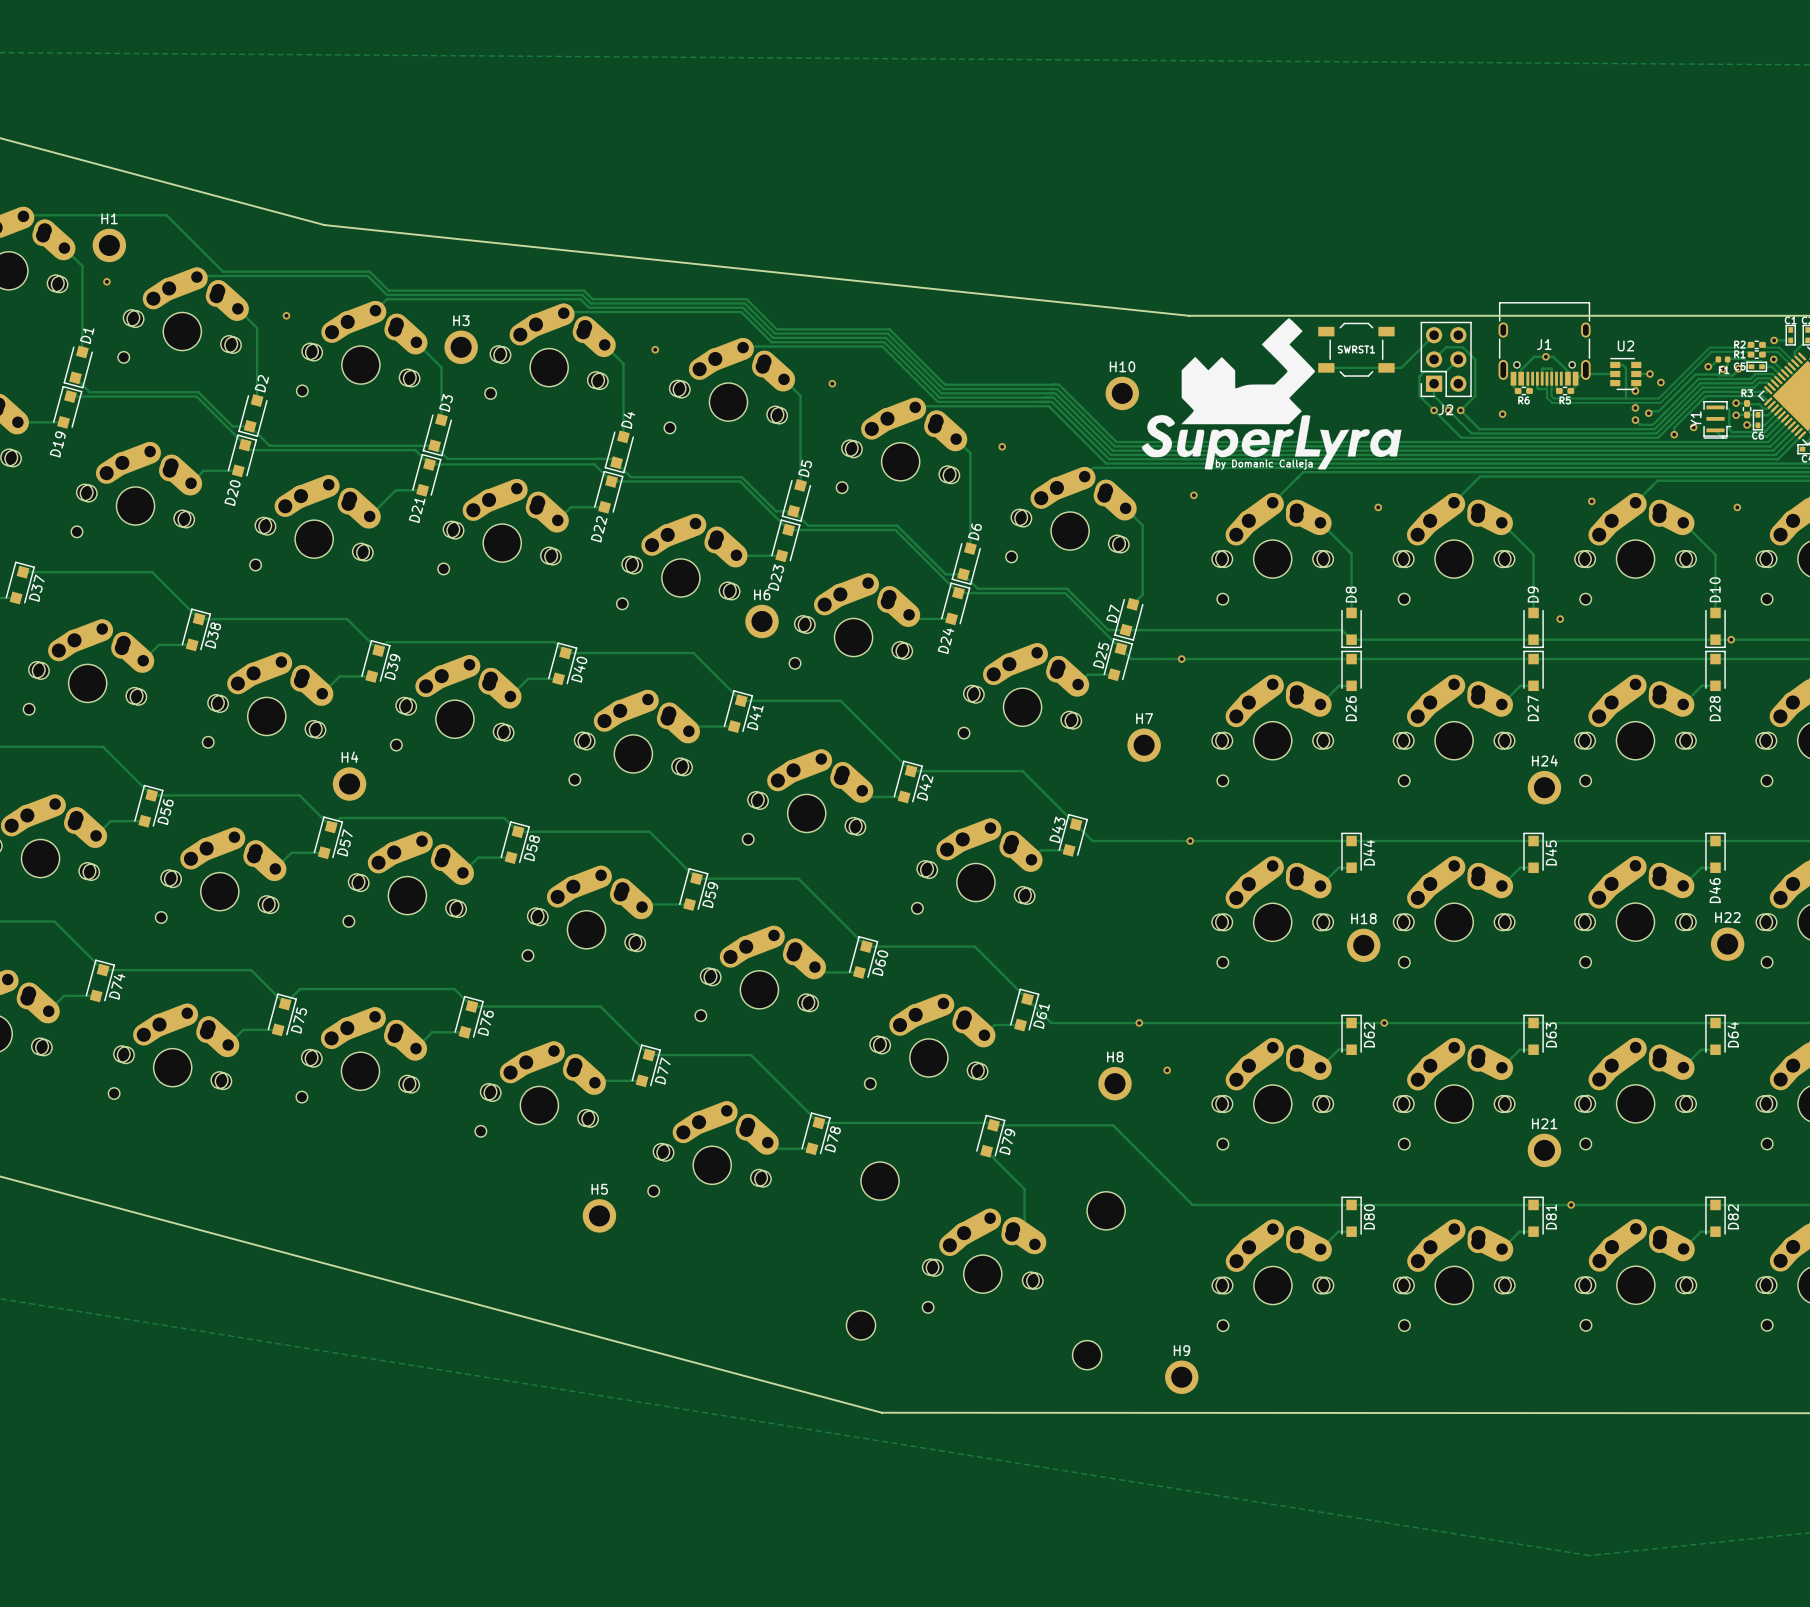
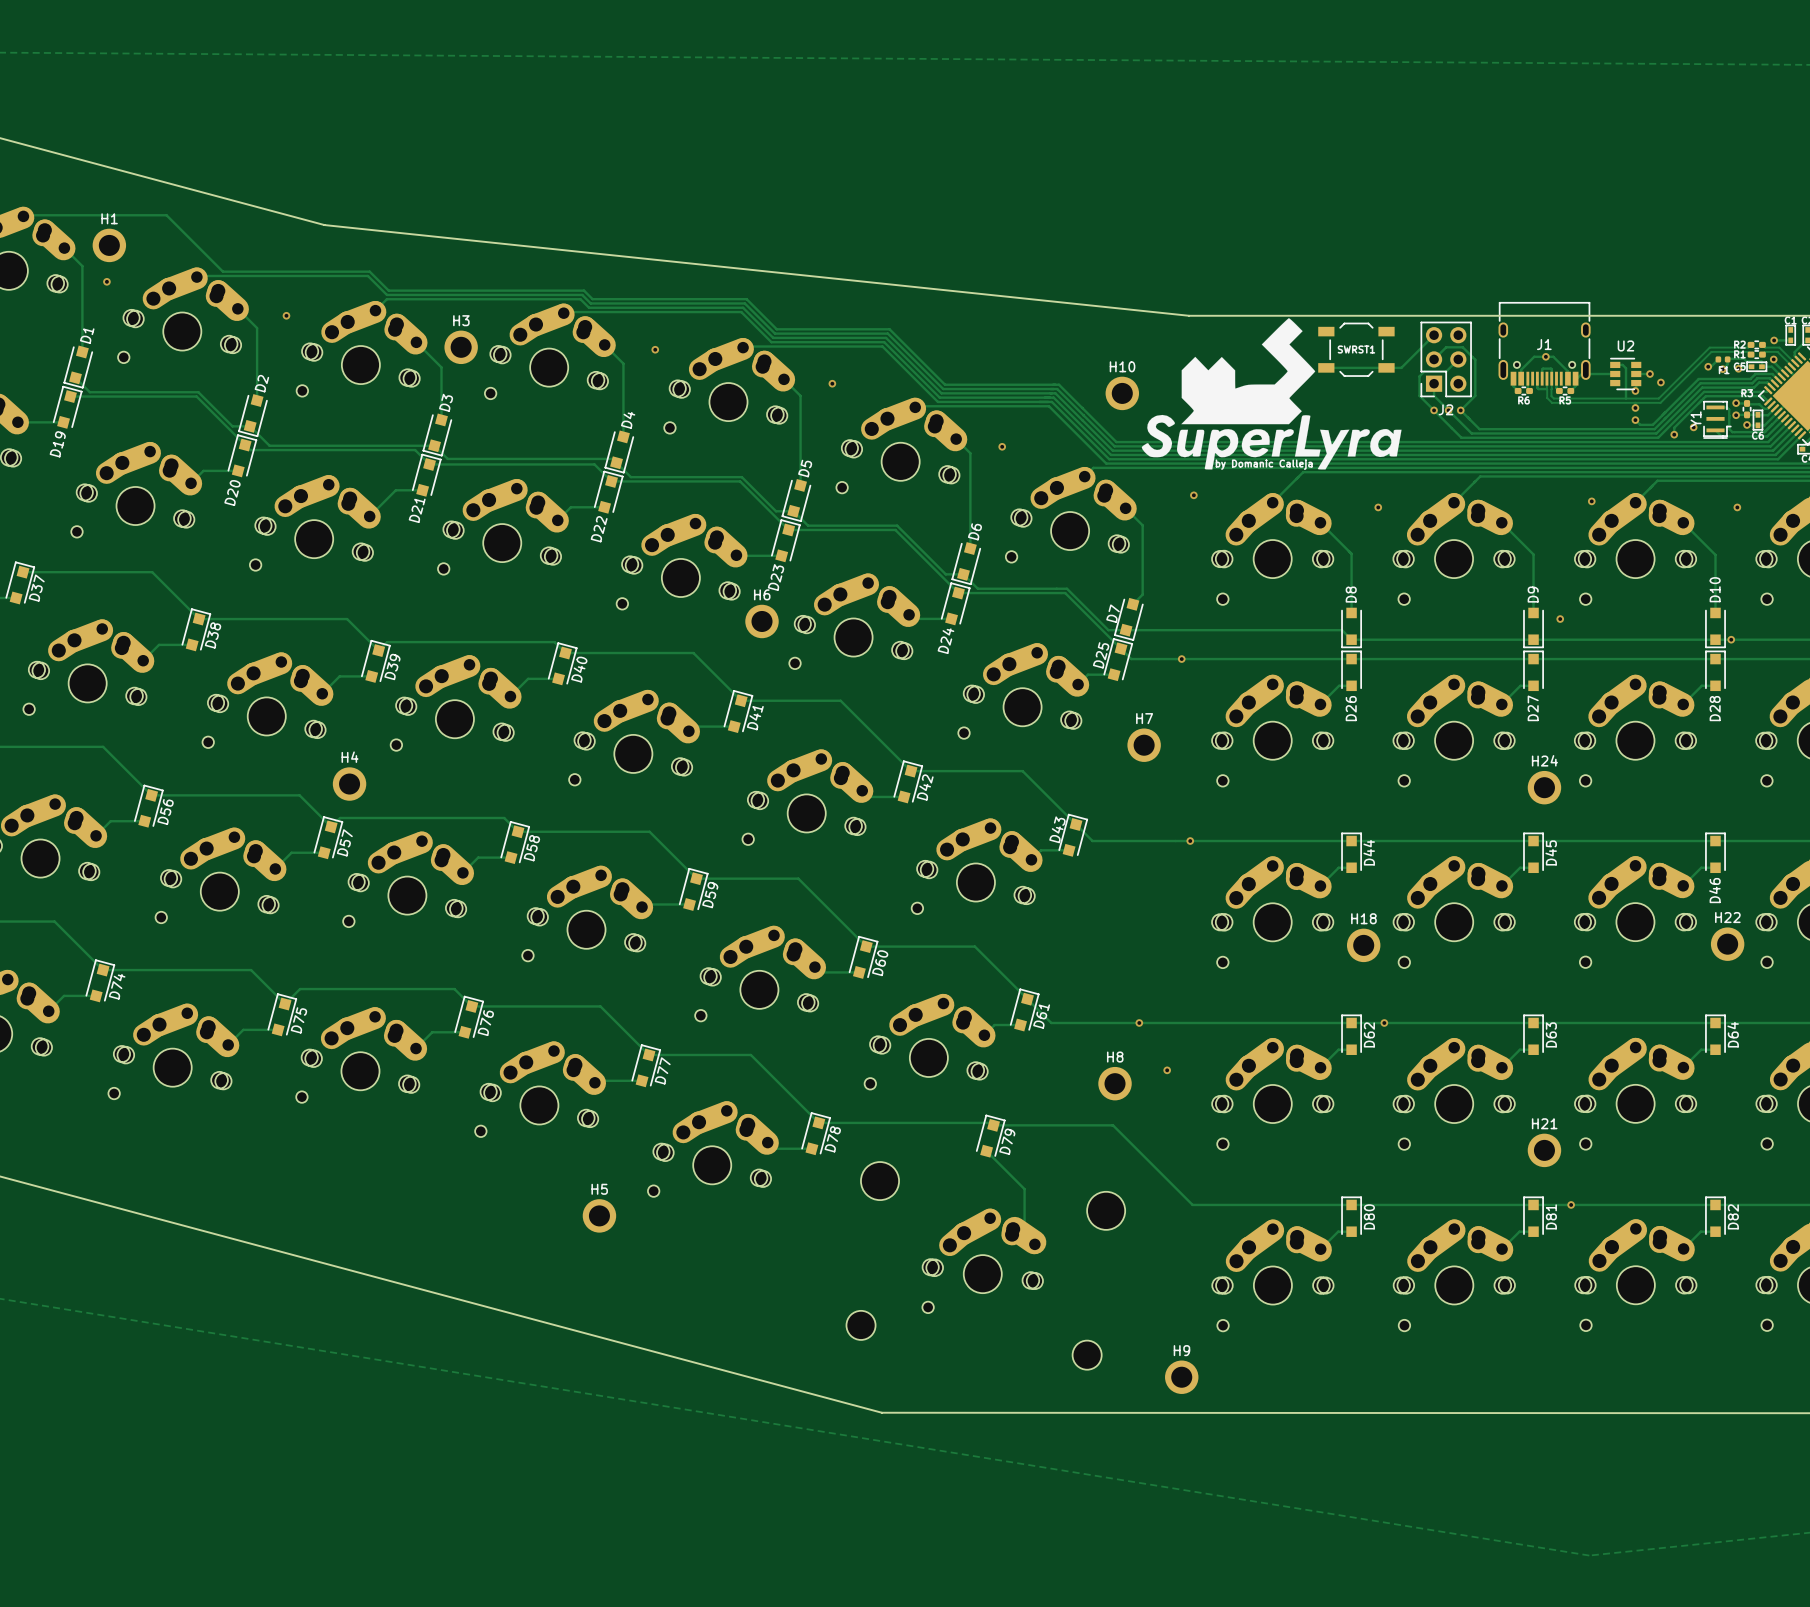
track: (1739, 369) (1732, 375) (1695, 374) (1658, 411) (1652, 411) -> none
via: (1648, 413) -> none
via: (1502, 414) -> none

